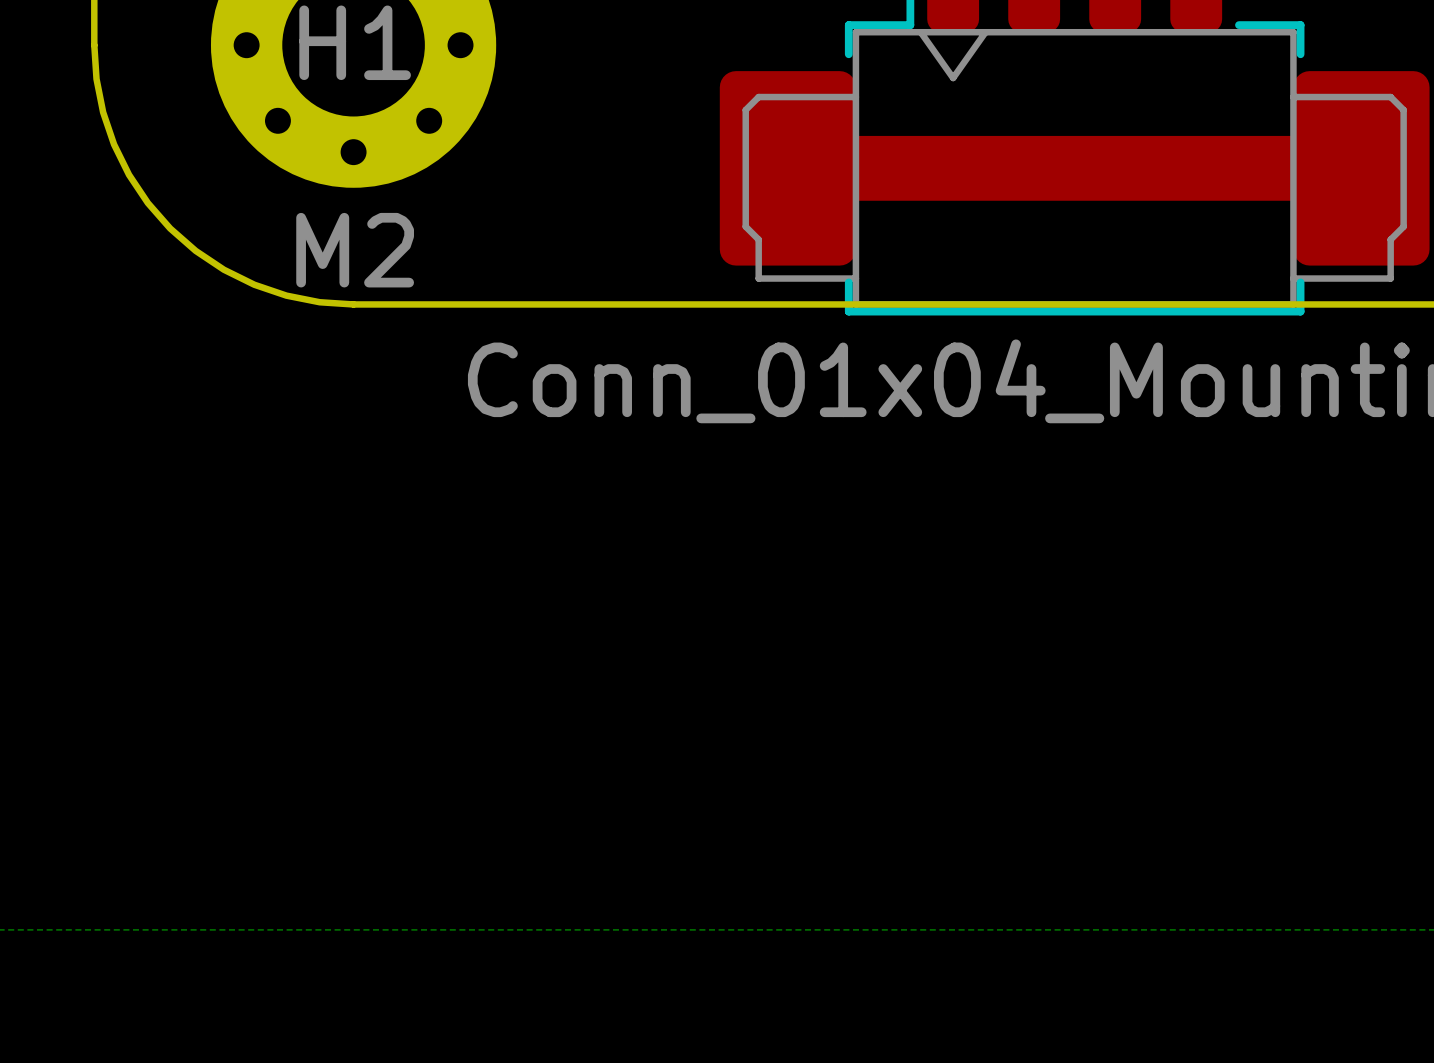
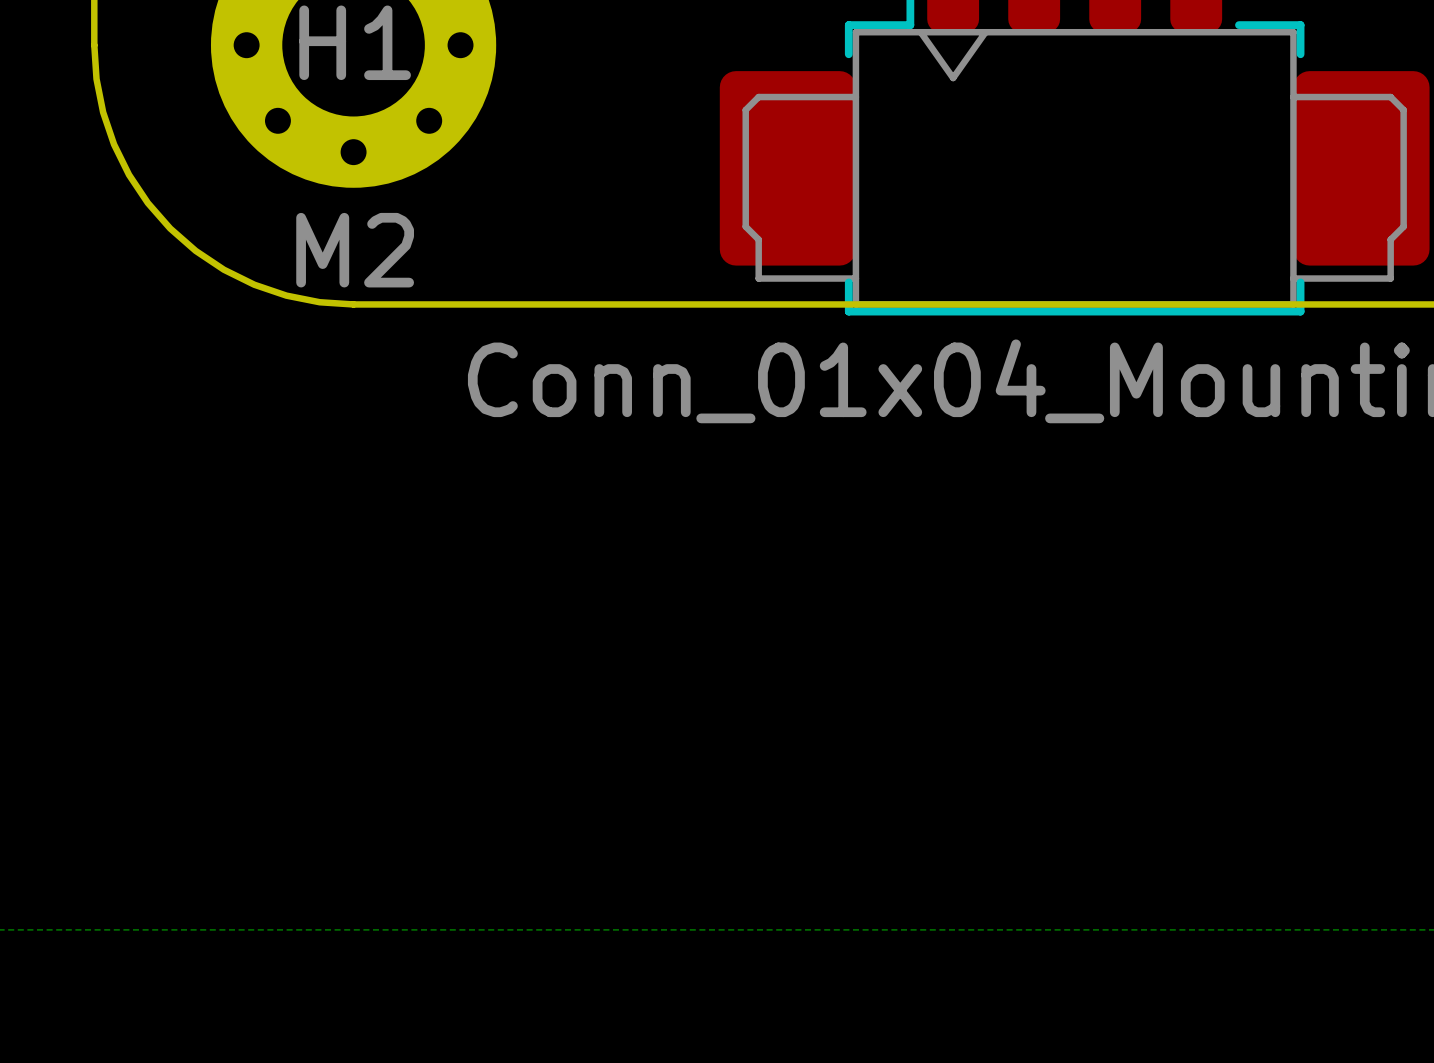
top track: (787, 168) (1361, 168) -> none

